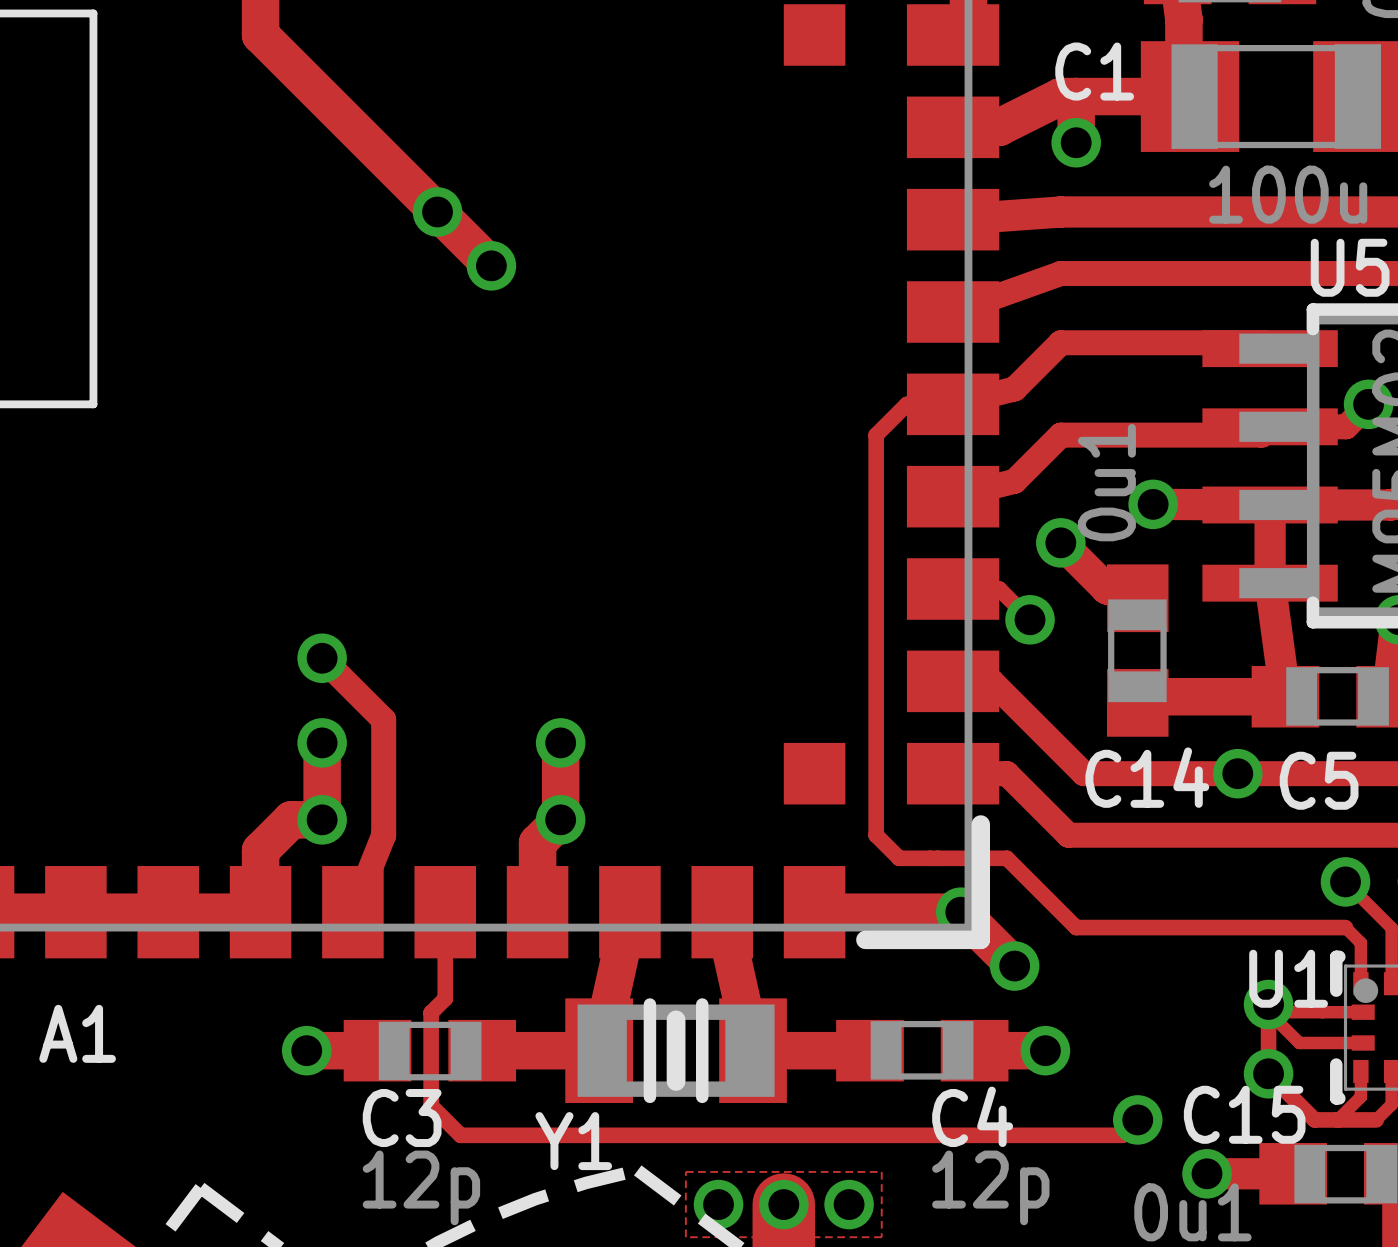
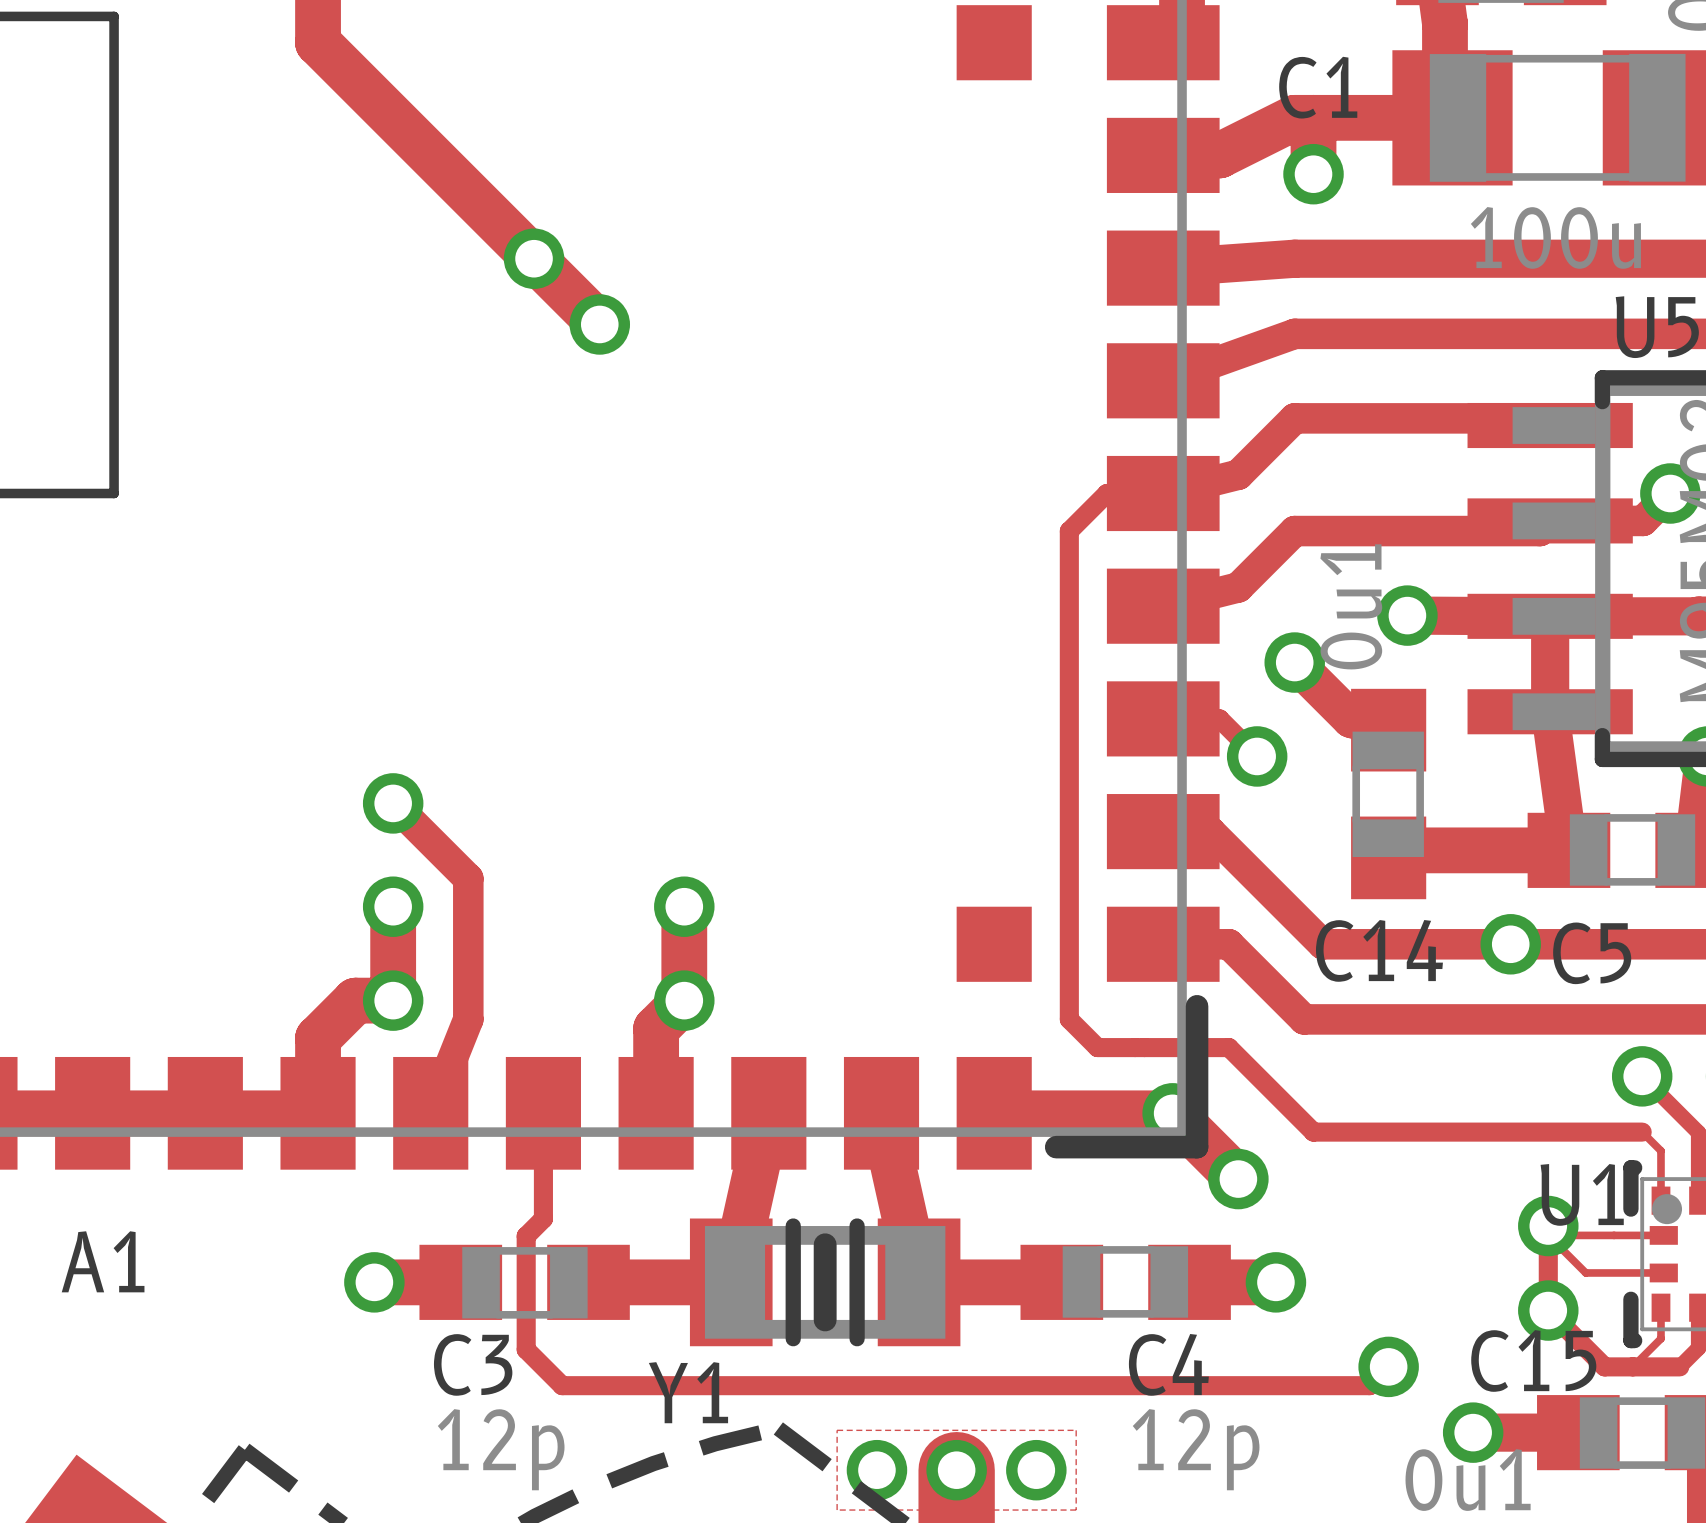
track width: thick (1345, 927) (1360, 942) (1360, 983) -> thin (1642, 1132) (1660, 1150) (1660, 1200)
track width: thick (1276, 1012) (1363, 1012) -> thin (1557, 1235) (1663, 1235)
track width: thick (1276, 1019) (1299, 1042) (1363, 1042) -> thin (1557, 1244) (1585, 1272) (1663, 1272)
track width: thick (1360, 1071) (1360, 1096) (1337, 1119) -> thin (1660, 1307) (1660, 1338) (1632, 1366)

